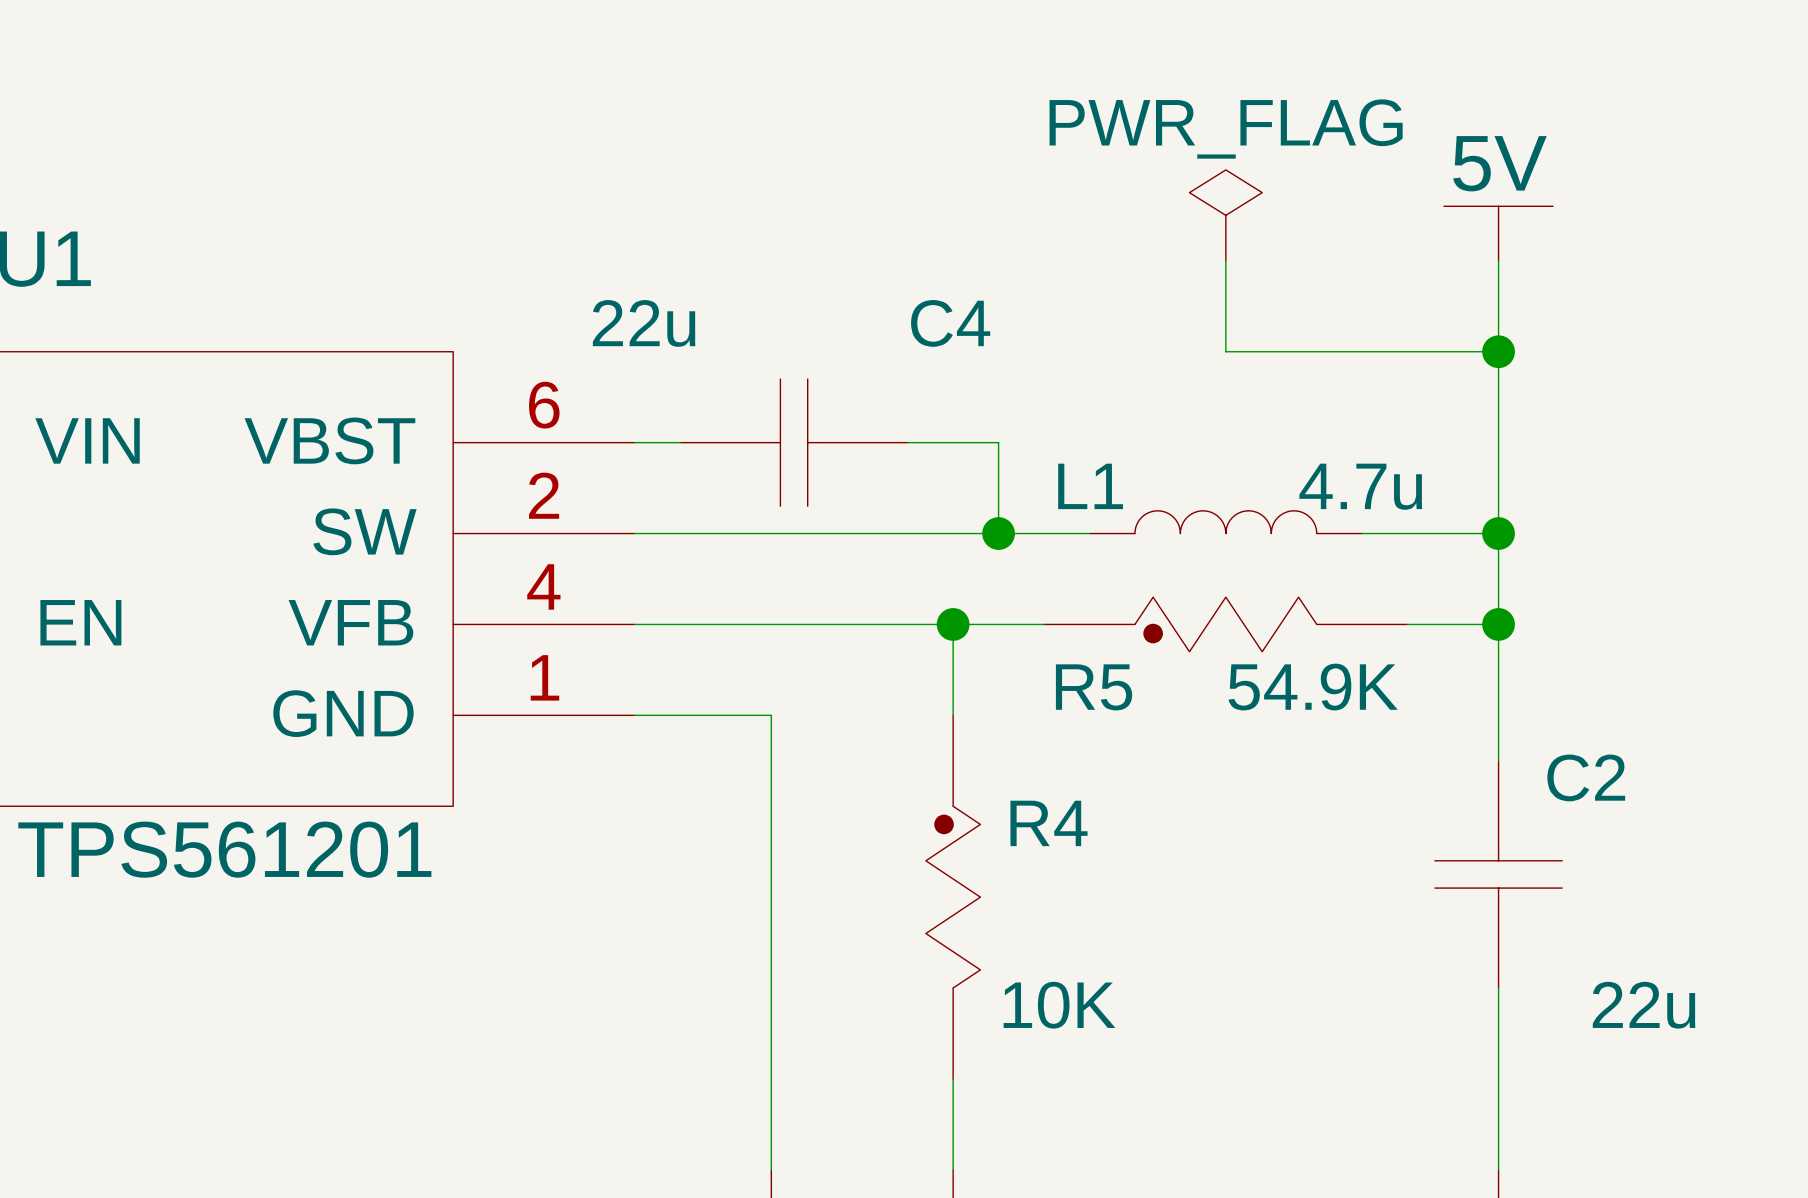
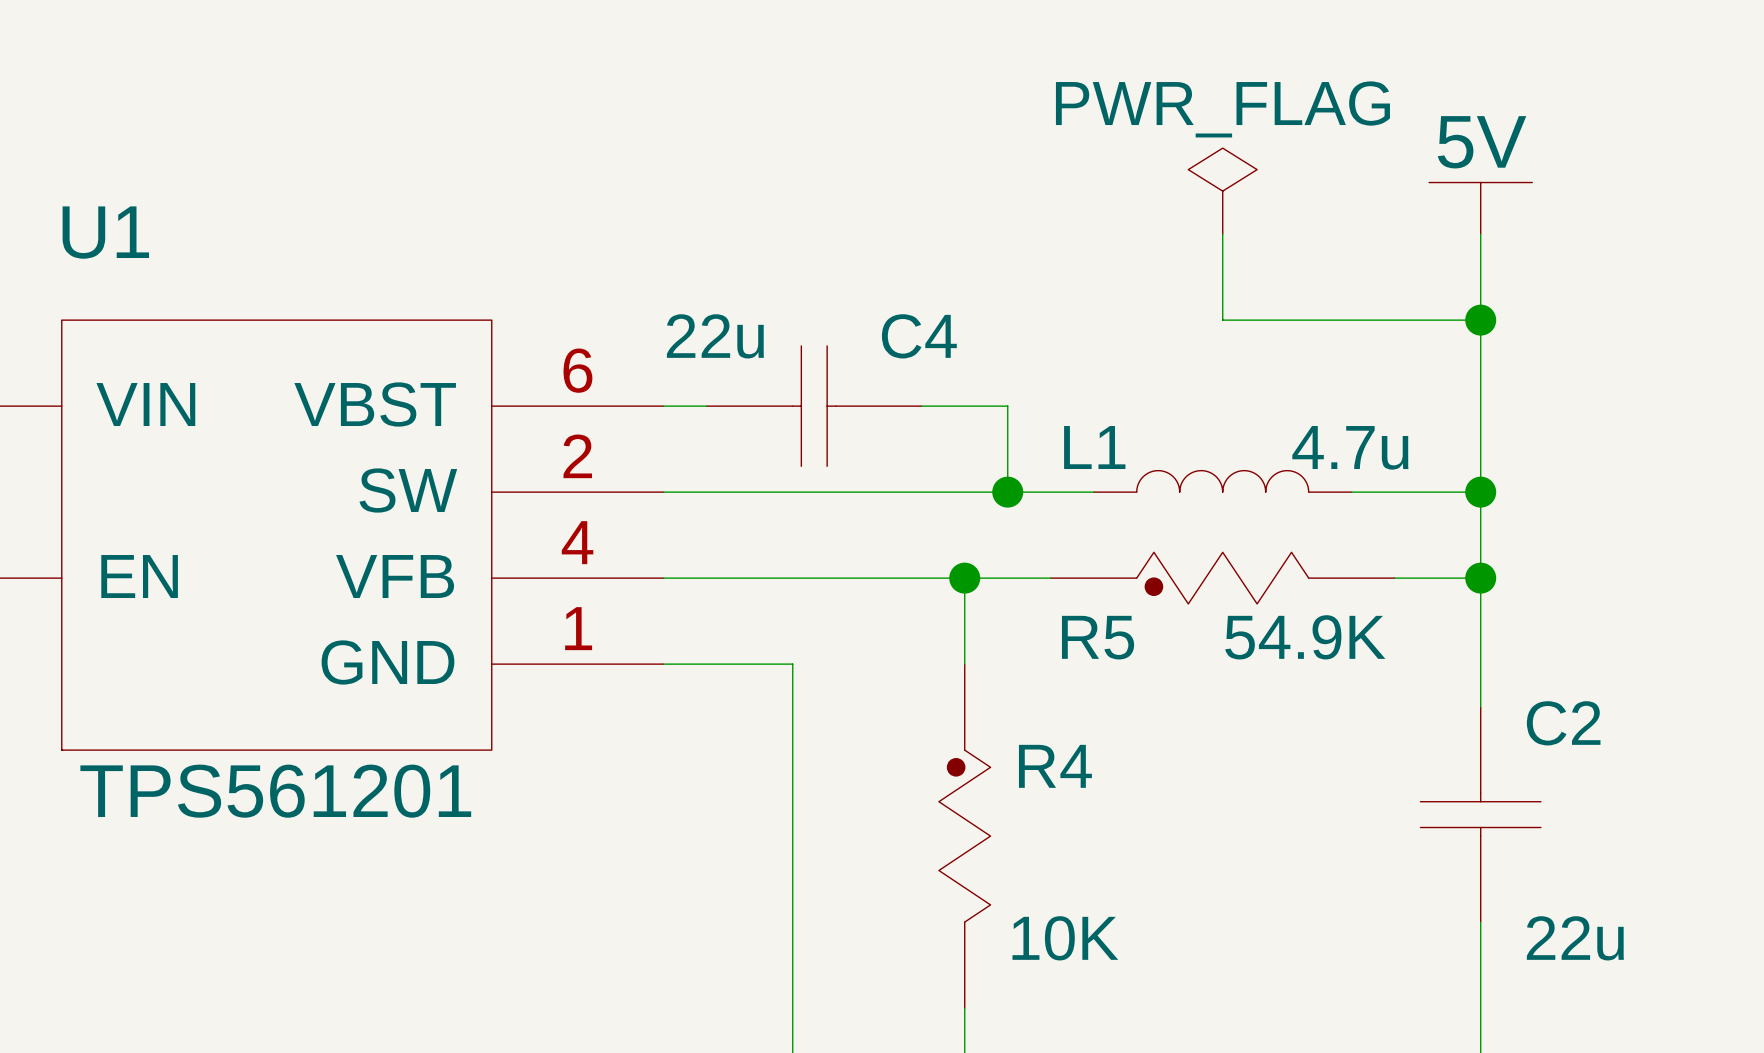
C4 value position: 22u (644, 323) -> 22u (715, 336)
C4 name position: C4 (950, 323) -> C4 (919, 336)
C2 value position: 22u (1644, 1005) -> 22u (1575, 938)

